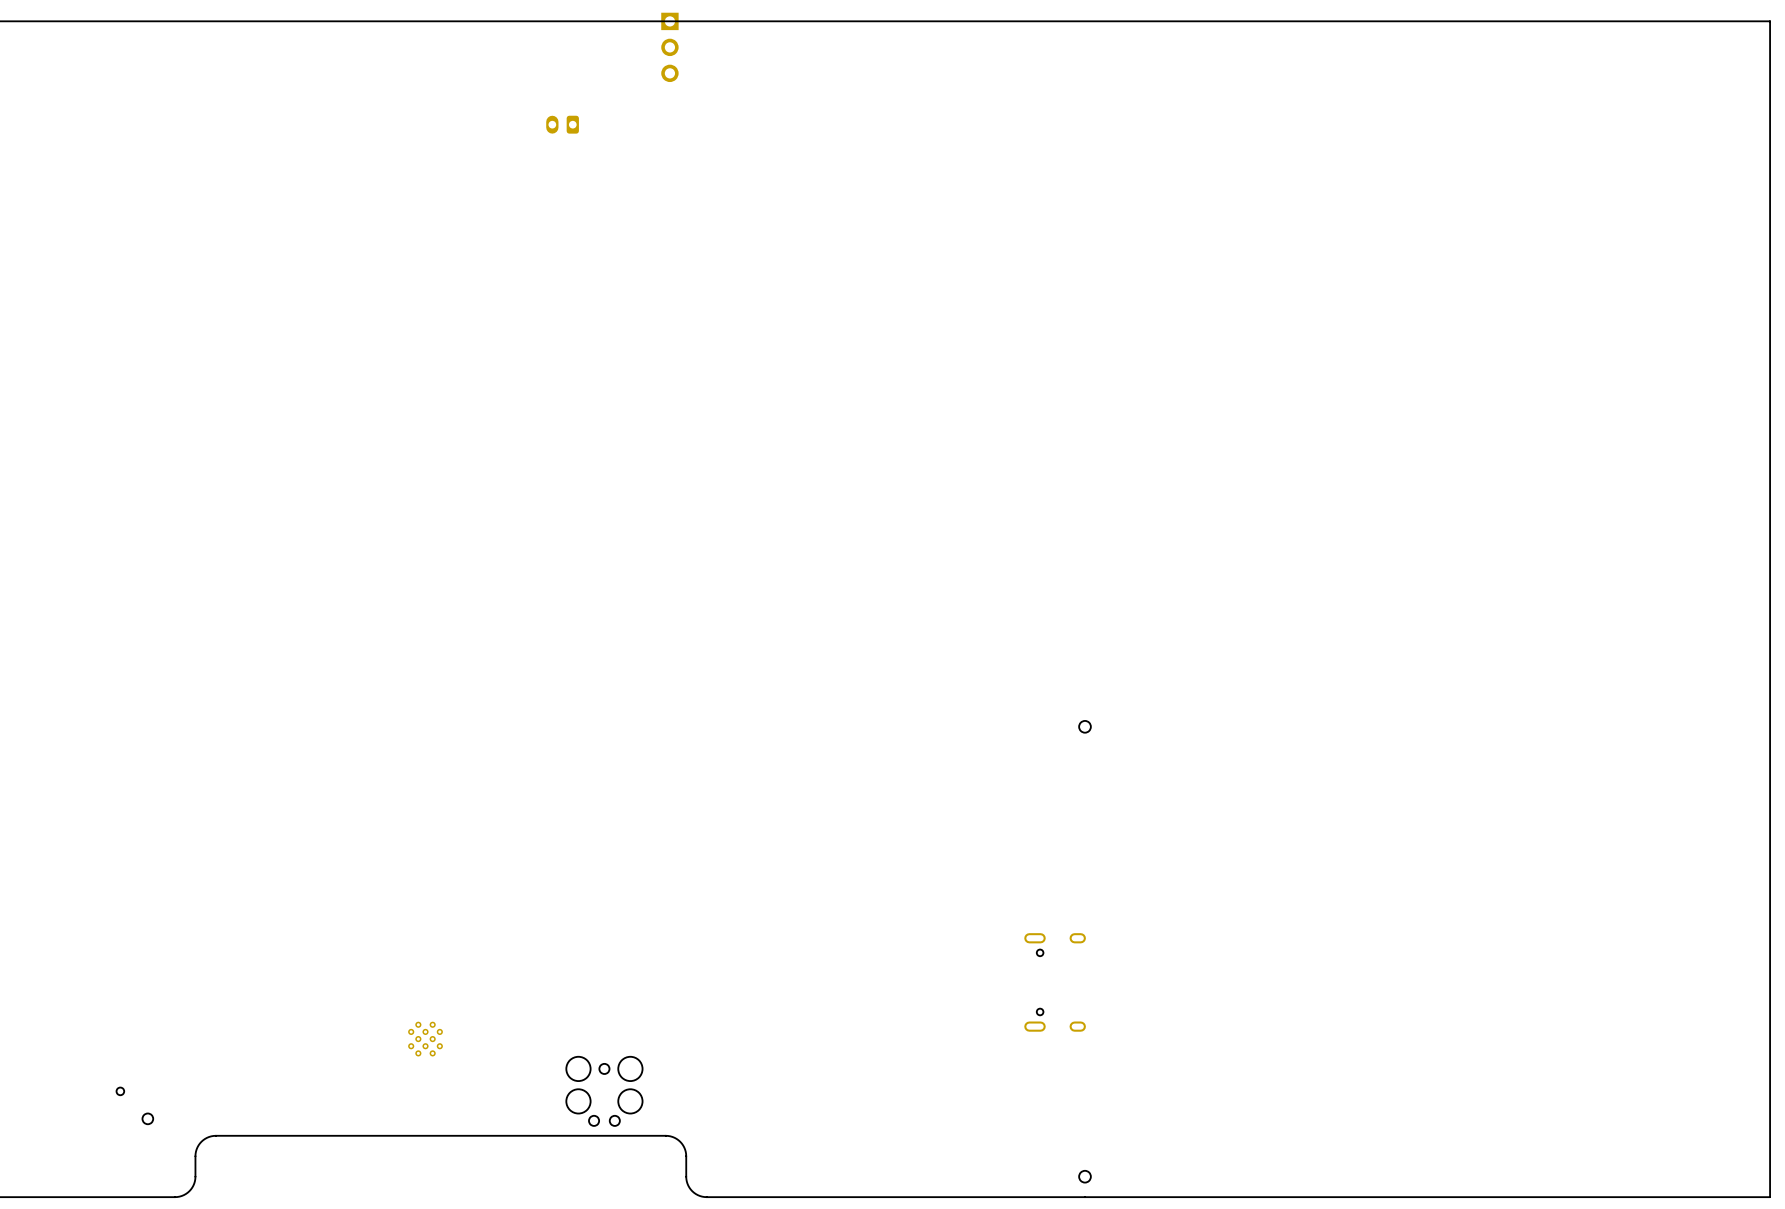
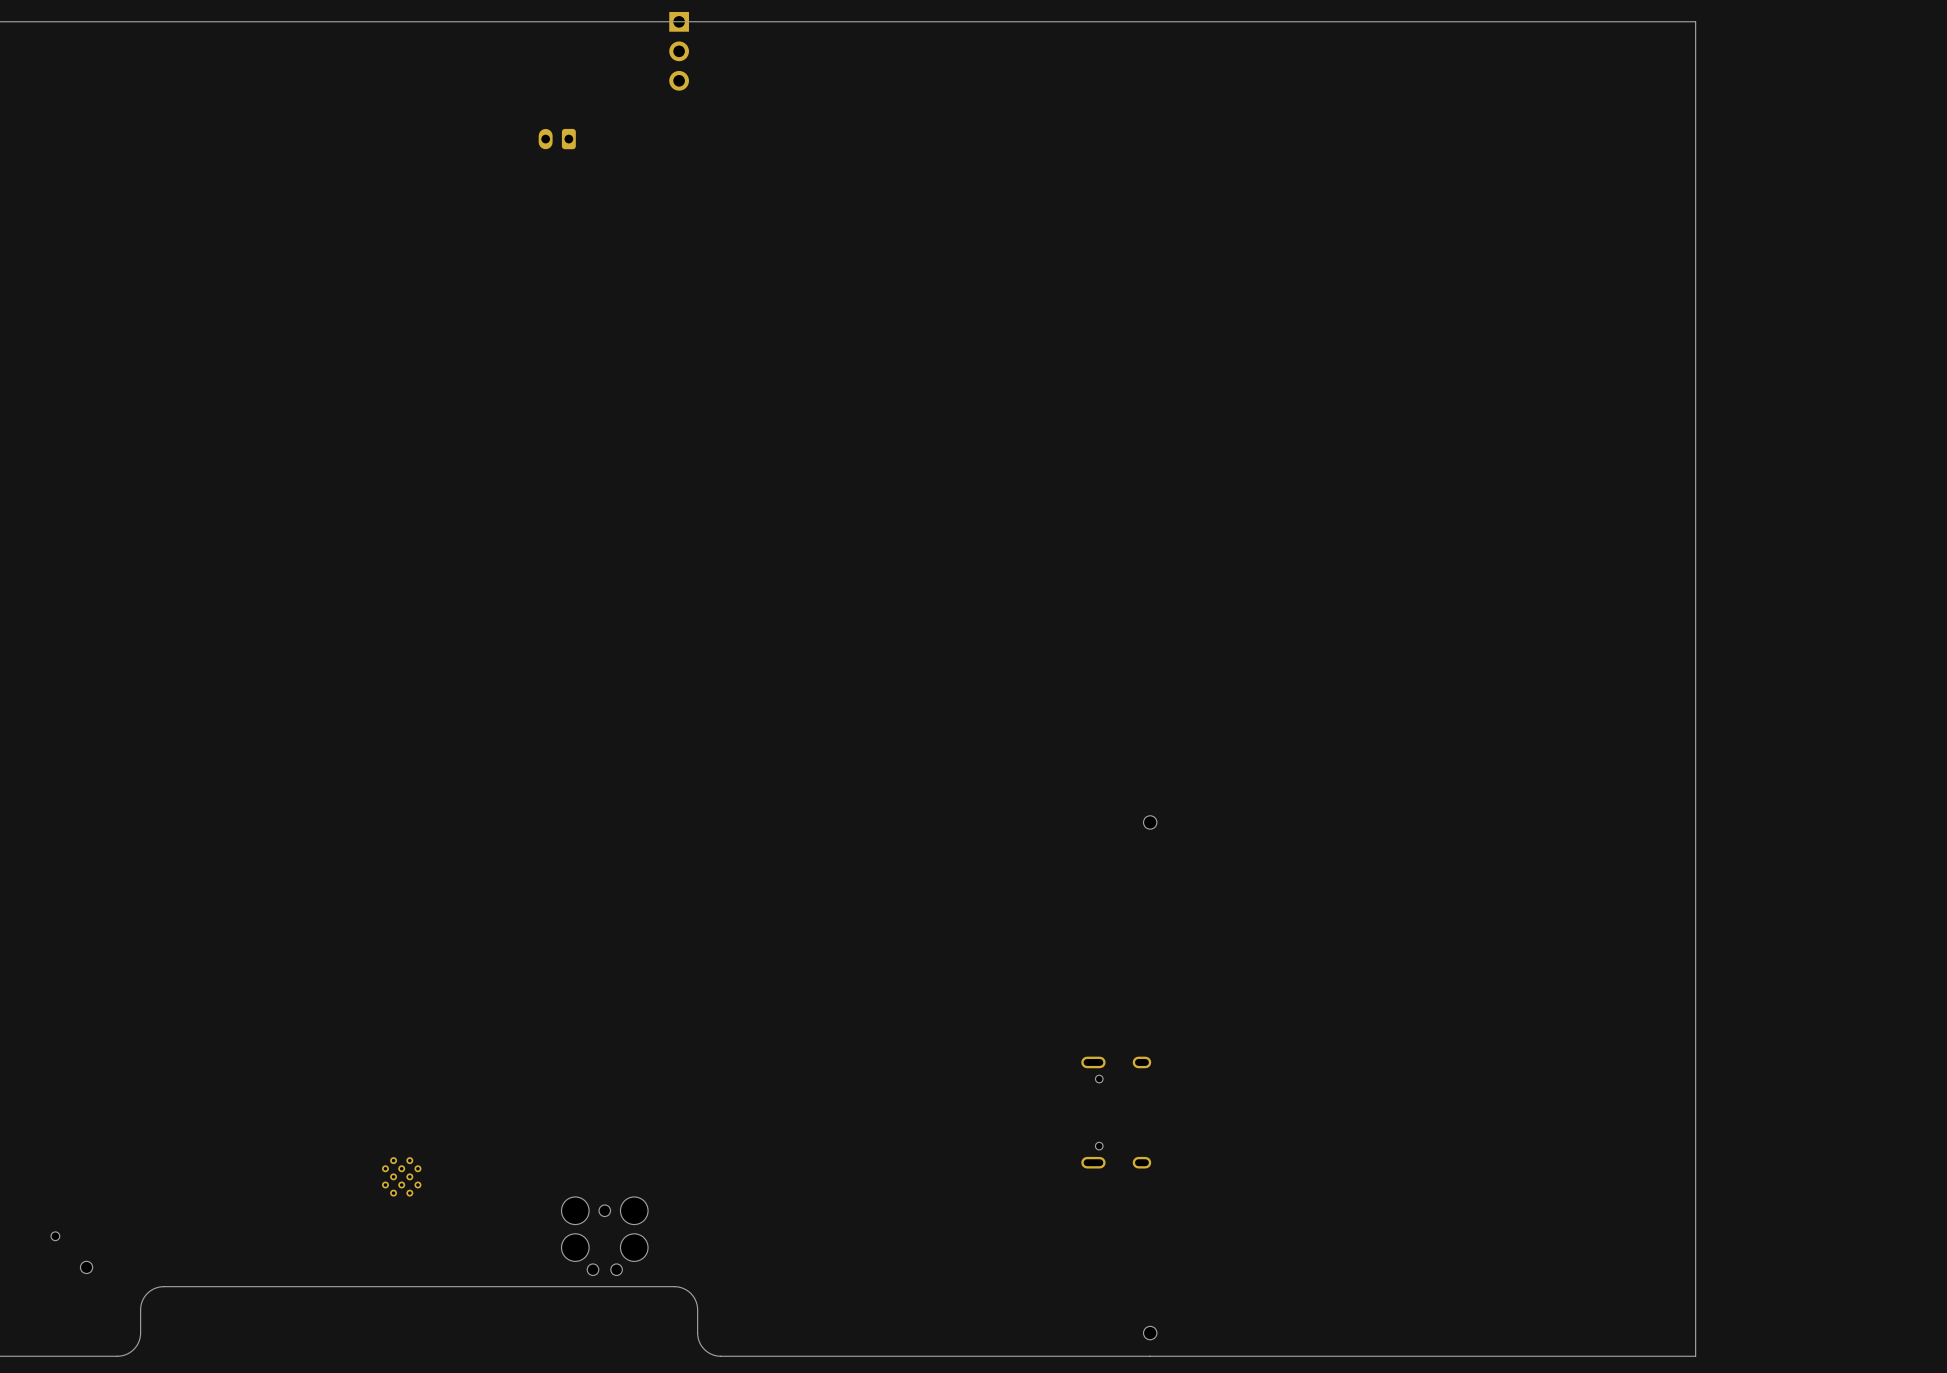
board edge: (1565, 21) (1770, 21) (1770, 1197) (1565, 1197) -> (1695, 21) (1695, 1356)

